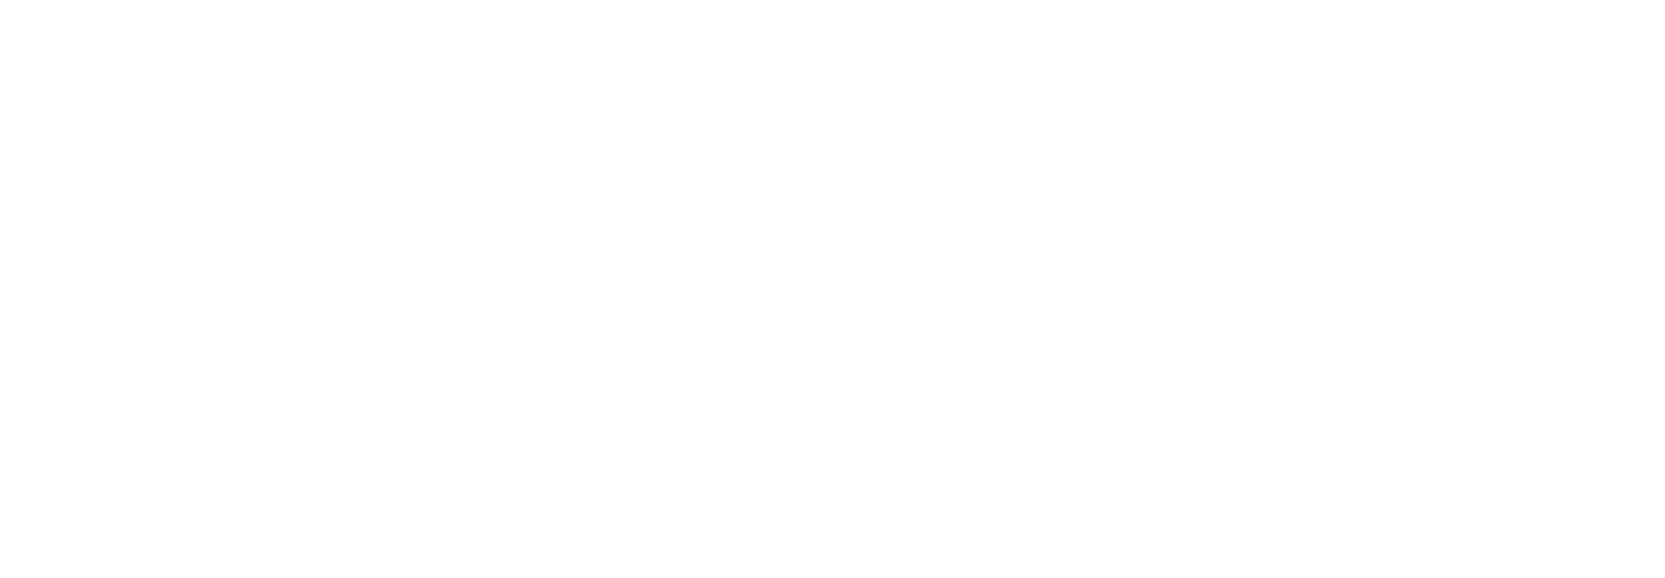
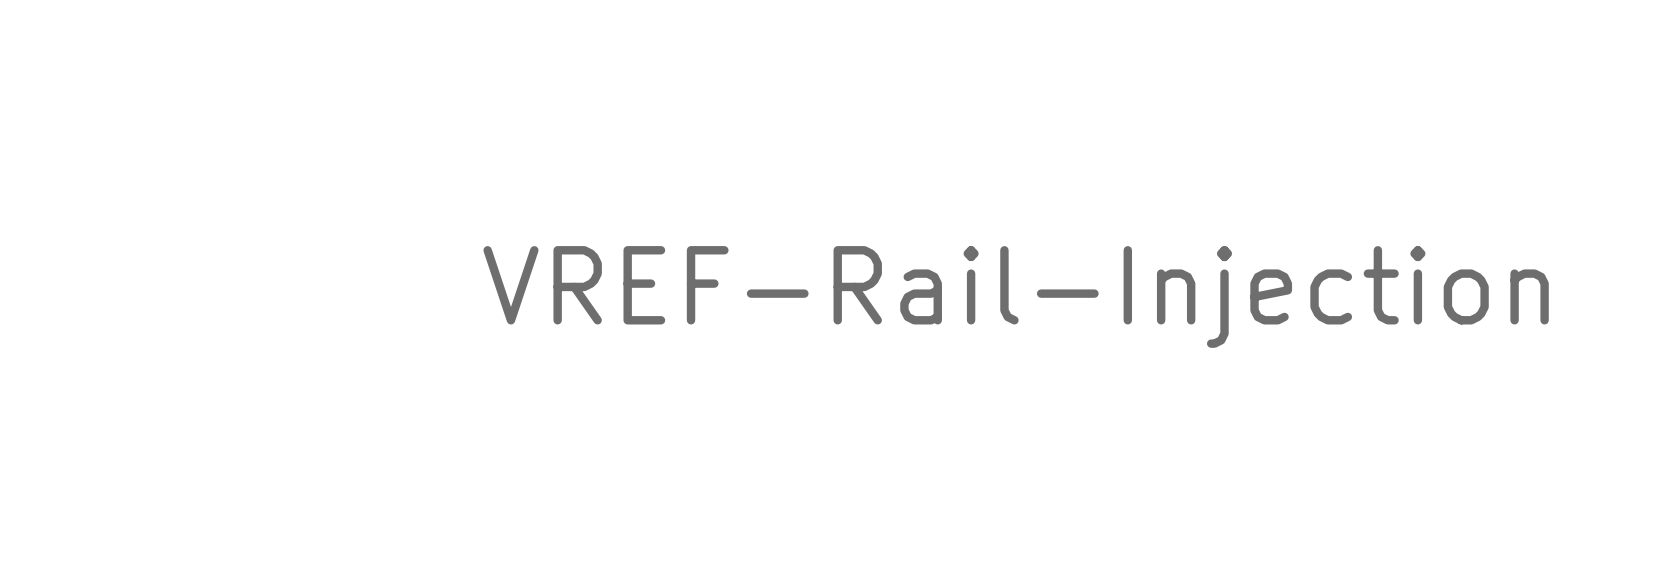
label: none -> VREF-Rail-Injection (1016, 296)

